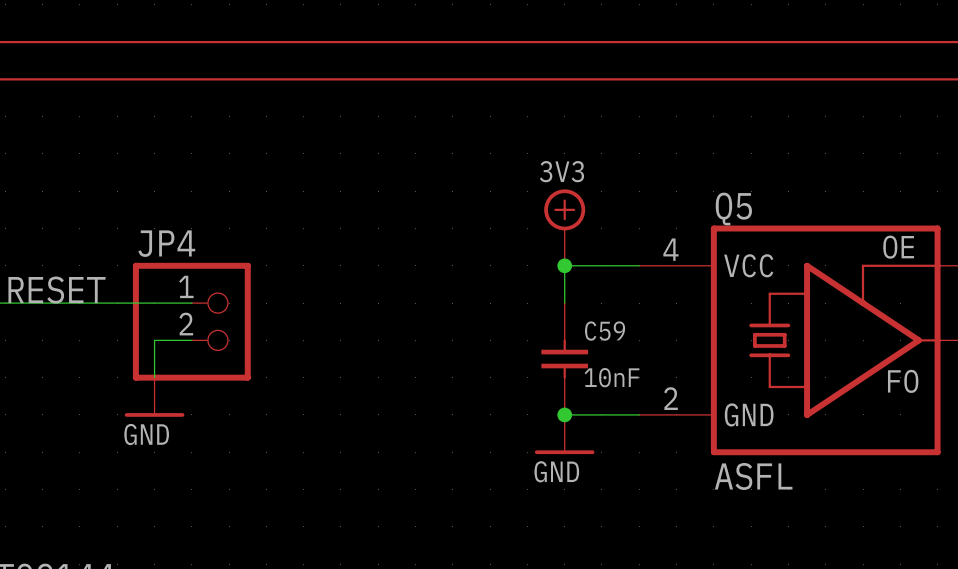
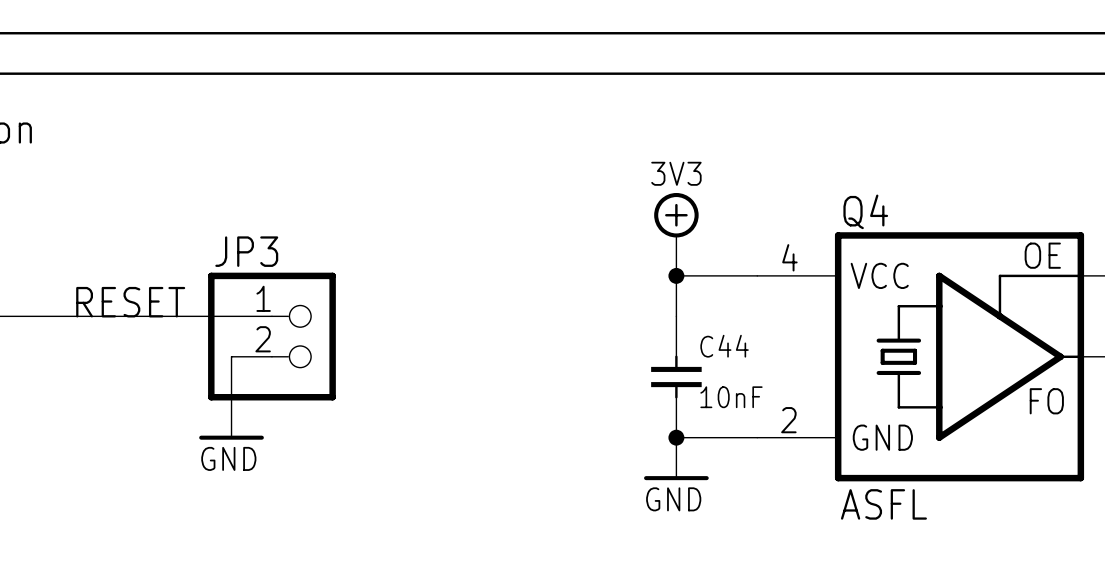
Q5 name: Q5 (733, 208) -> Q4 (865, 211)
JP4 name: JP4 (166, 243) -> JP3 (246, 251)
C59 name: C59 (605, 331) -> C44 (724, 346)

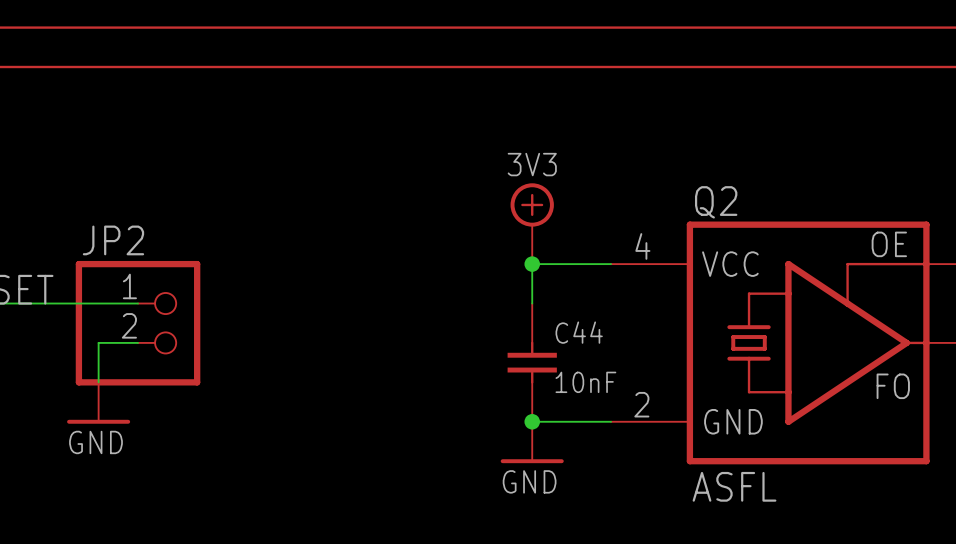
Q4 name: Q4 (865, 211) -> Q2 (716, 202)
JP3 name: JP3 (246, 251) -> JP2 (113, 240)

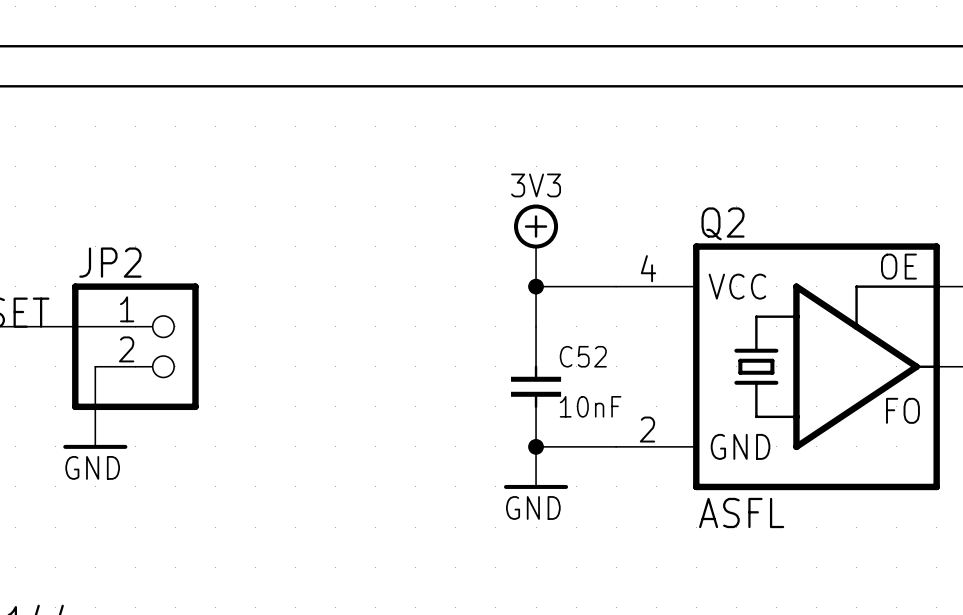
C44 name: C44 (579, 332) -> C52 (583, 356)

